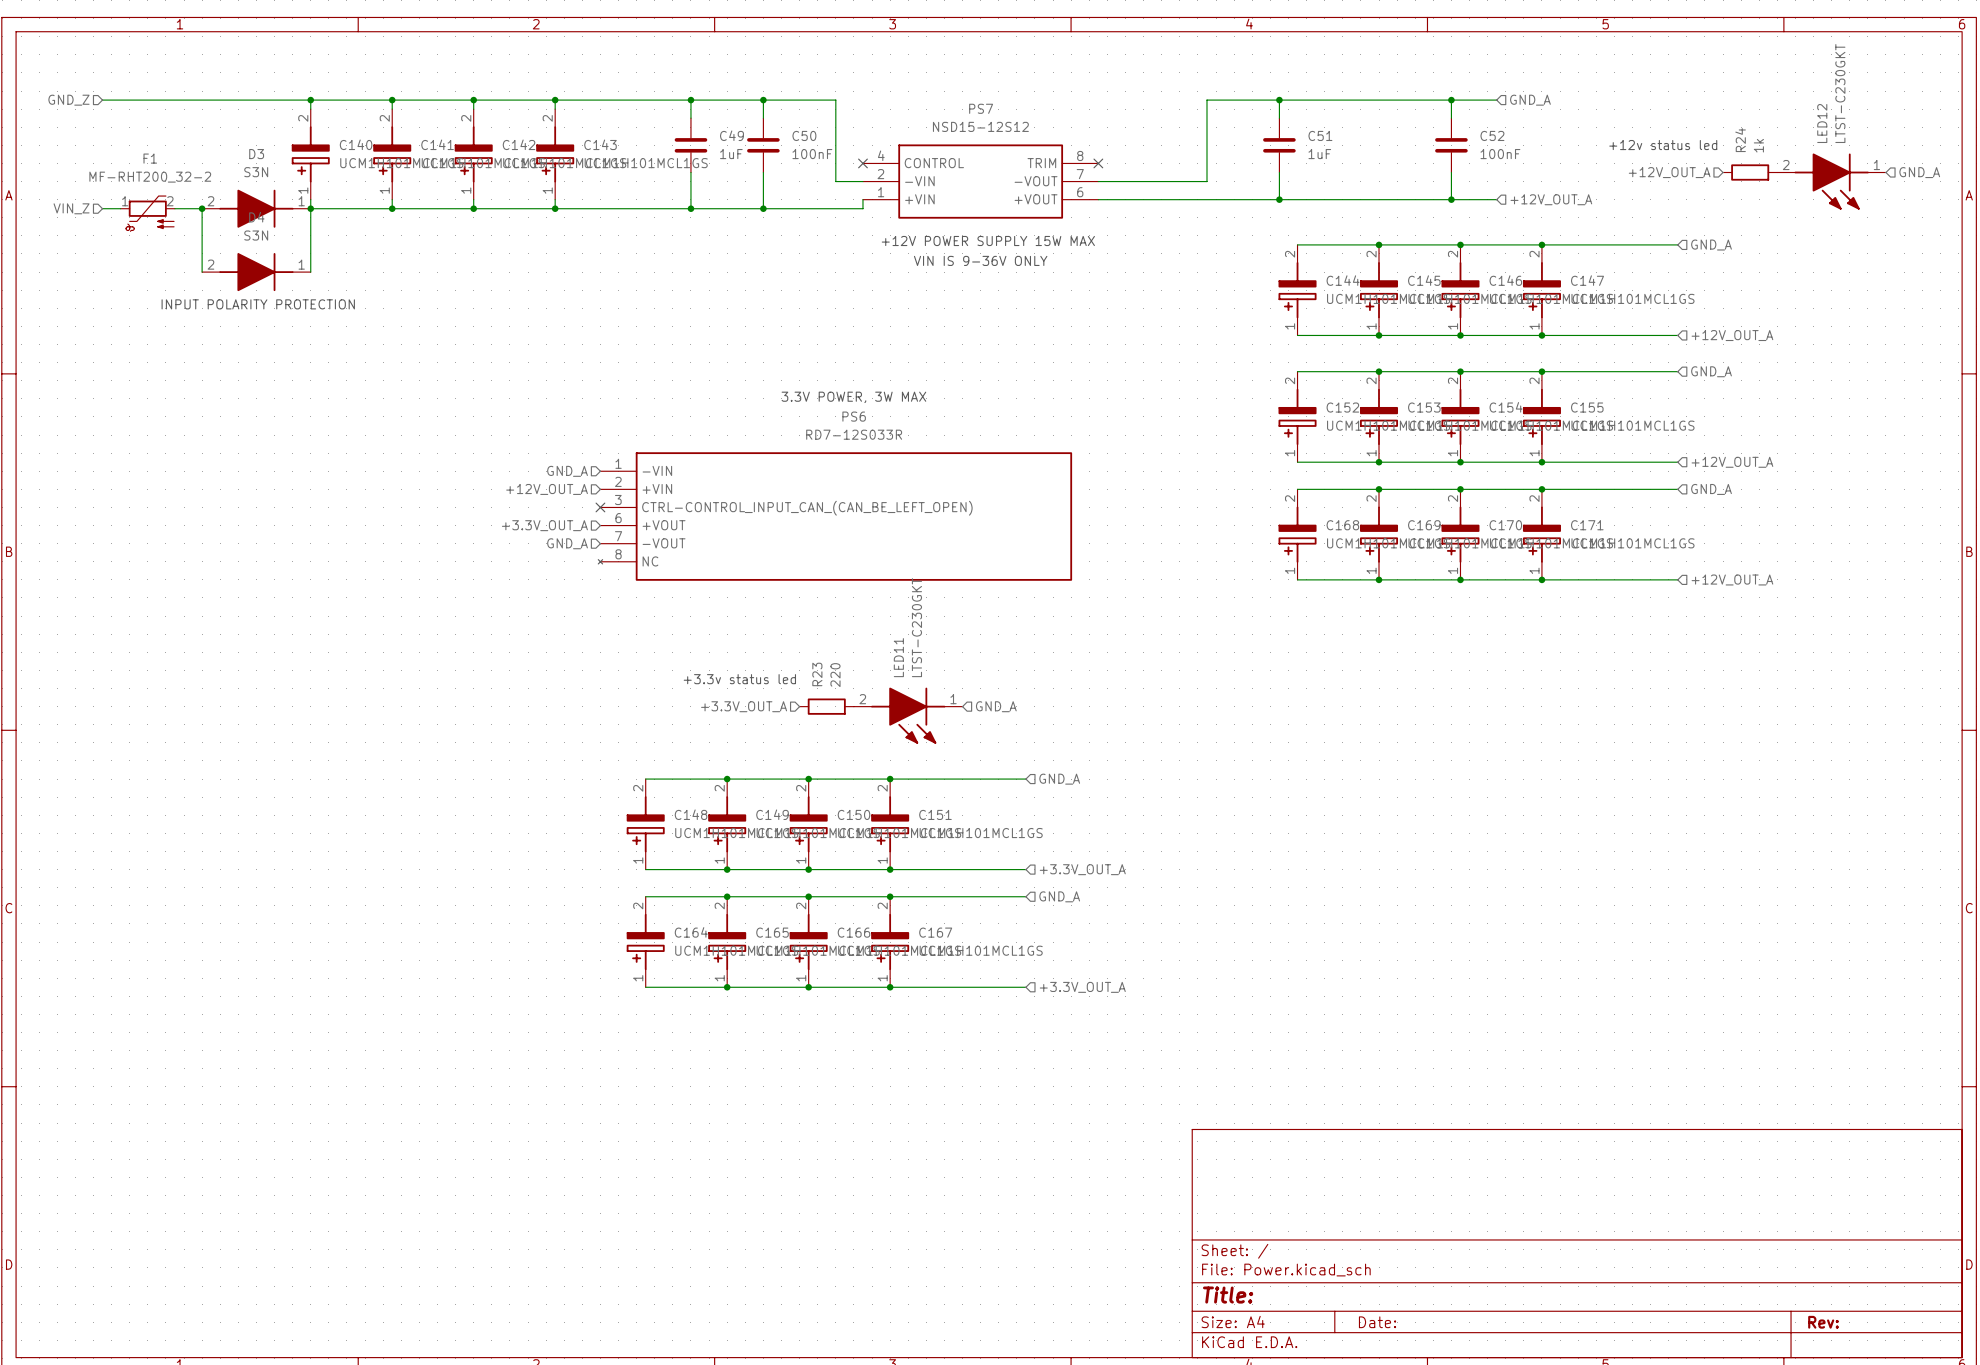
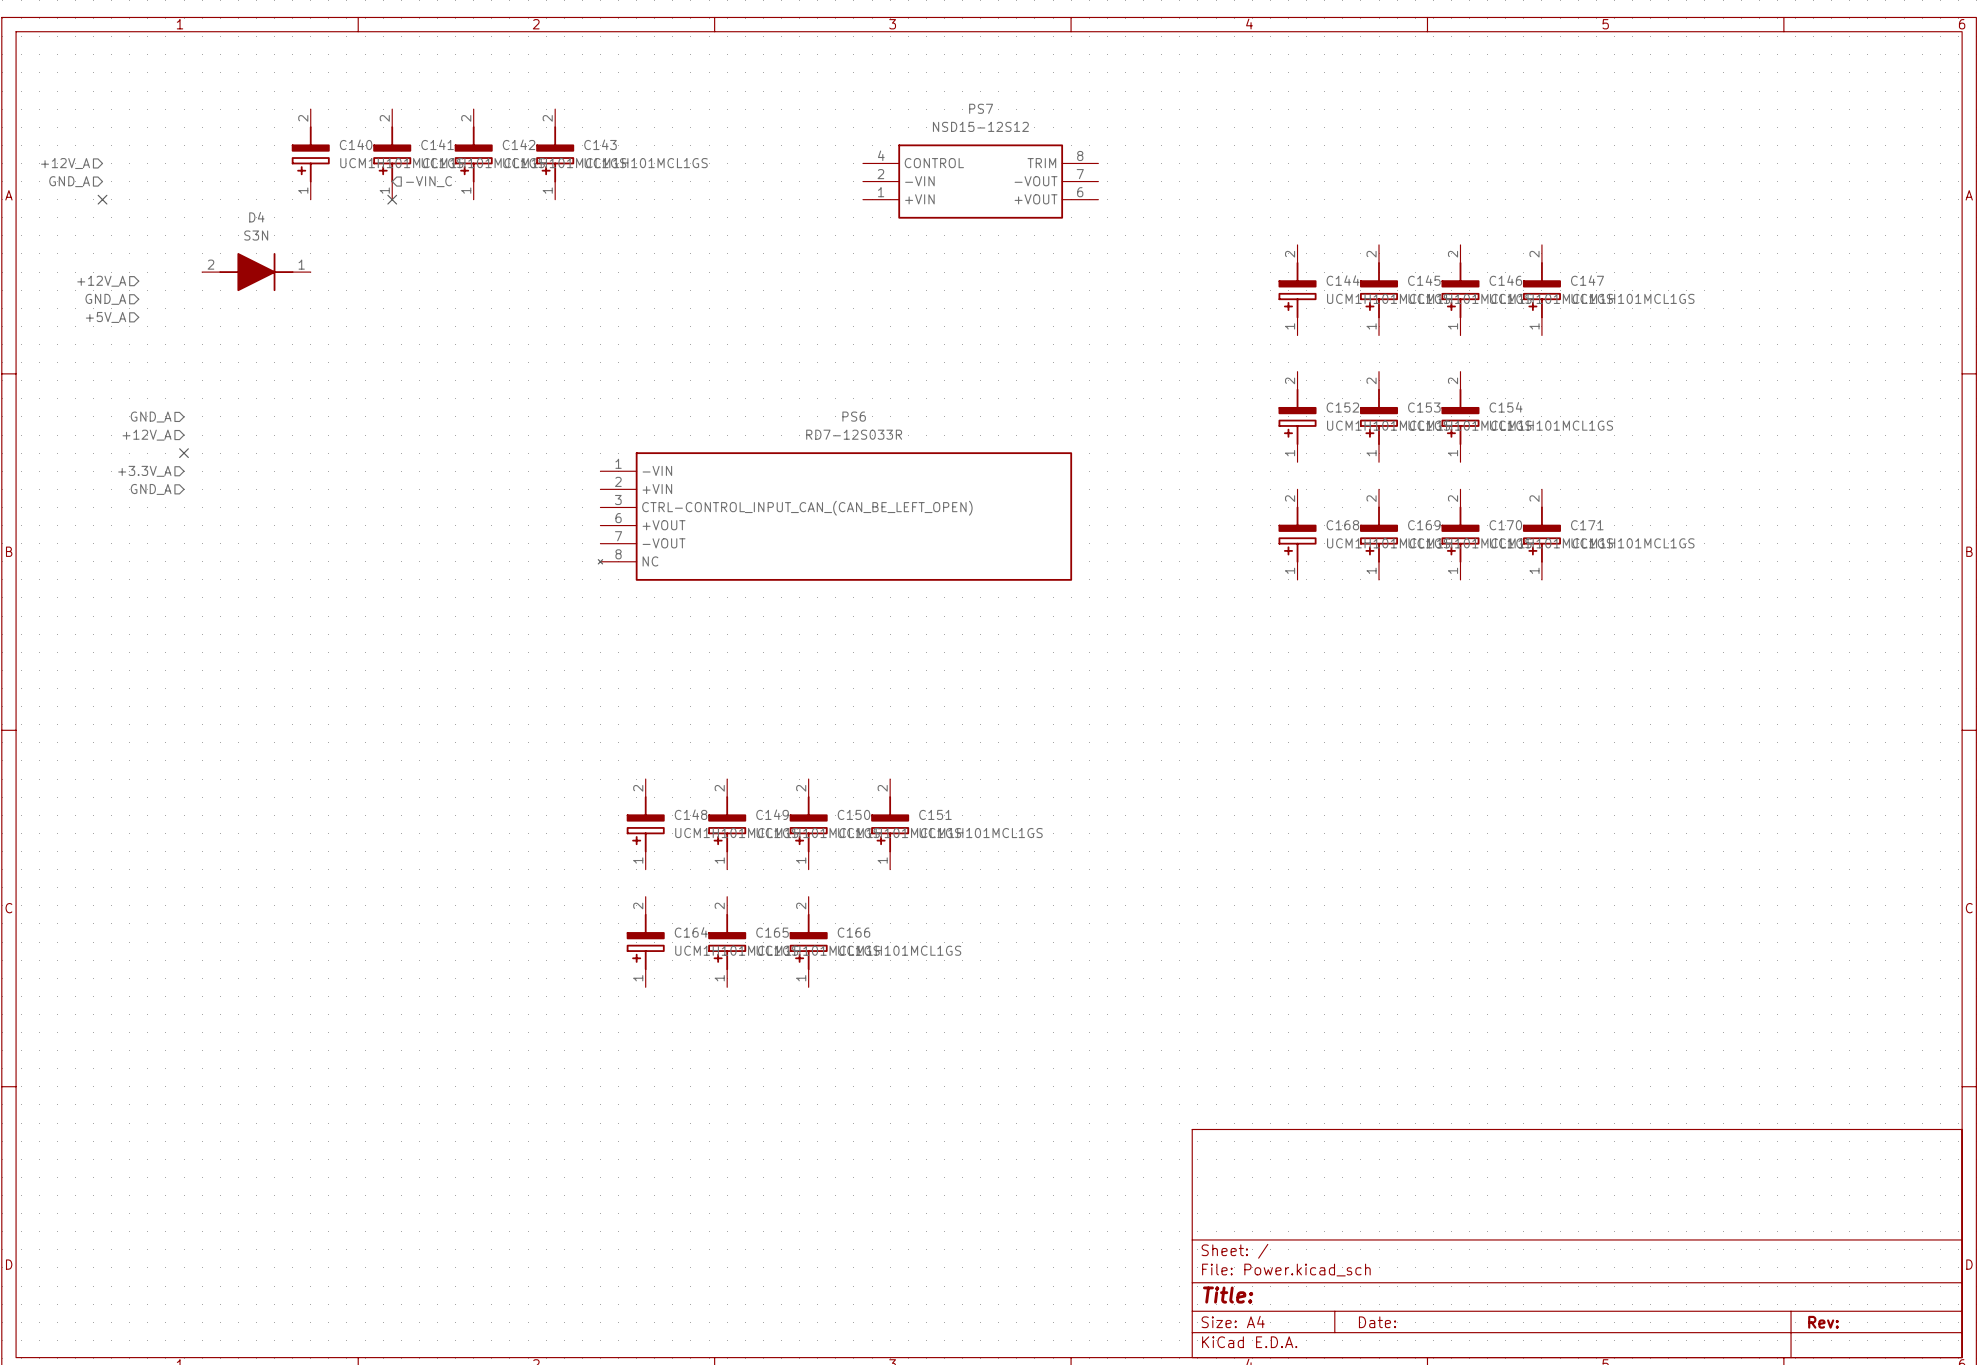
hierarchical label: GND_Z (68, 100) -> none
wire: (102, 100) (835, 100) (835, 181) (862, 181) -> none
wire: (310, 100) (310, 109) -> none
junction: (310, 100) -> none
wire: (392, 100) (392, 109) -> none
junction: (392, 100) -> none
wire: (473, 100) (473, 109) -> none
junction: (473, 100) -> none
wire: (555, 100) (555, 109) -> none
junction: (555, 100) -> none
wire: (690, 100) (690, 118) -> none
junction: (690, 100) -> none
wire: (763, 100) (763, 118) -> none
junction: (763, 100) -> none
wire: (1279, 100) (1279, 118) -> none
junction: (1279, 100) -> none
wire: (1451, 100) (1451, 118) -> none
junction: (1451, 100) -> none
wire: (1496, 100) (1206, 100) (1206, 181) (1098, 181) -> none
hierarchical label: GND_A (1530, 100) -> none
C49: 1uF (690, 145) -> none
C50: 100nF (763, 145) -> none
C51: 1uF (1279, 145) -> none
C52: 100nF (1451, 145) -> none
text: +12v status led (1663, 145) -> none
hierarchical label: none -> +12V_A (65, 163)
no-connect mark: (862, 163) -> none
no-connect mark: (1098, 163) -> none
wire: (690, 172) (690, 208) -> none
wire: (763, 172) (763, 208) -> none
wire: (1279, 172) (1279, 199) -> none
wire: (1451, 172) (1451, 199) -> none
hierarchical label: +12V_OUT_A (1669, 172) -> none
R24: 1k (1750, 172) -> none
hierarchical label: GND_A (1919, 172) -> none
hierarchical label: none -> GND_A (69, 181)
hierarchical label: none -> -VIN_C (429, 181)
LED12: LTST-C230GKT (1831, 181) -> none
no-connect mark: none -> (102, 199)
wire: (310, 199) (310, 272) -> none
wire: (392, 199) (392, 208) -> none
no-connect mark: none -> (392, 199)
wire: (473, 199) (473, 208) -> none
wire: (555, 199) (555, 208) -> none
wire: (862, 199) (862, 208) (310, 208) -> none
wire: (1098, 199) (1496, 199) -> none
junction: (1279, 199) -> none
junction: (1451, 199) -> none
hierarchical label: +12V_OUT_A (1551, 199) -> none
hierarchical label: VIN_Z (71, 208) -> none
wire: (102, 208) (120, 208) -> none
wire: (174, 208) (202, 208) (202, 272) -> none
junction: (202, 208) -> none
D3: S3N (256, 208) -> none
junction: (310, 208) -> none
junction: (392, 208) -> none
junction: (473, 208) -> none
junction: (555, 208) -> none
junction: (690, 208) -> none
junction: (763, 208) -> none
F1: MF-RHT200_32-2 (147, 213) -> none
text: +12V POWER SUPPLY 15W MAX (988, 240) -> none
wire: (1297, 244) (1677, 244) -> none
junction: (1379, 244) -> none
junction: (1460, 244) -> none
junction: (1541, 244) -> none
hierarchical label: GND_A (1711, 245) -> none
text: VIN IS 9-36V ONLY (980, 260) -> none
hierarchical label: none -> +12V_A (101, 281)
hierarchical label: none -> GND_A (105, 299)
text: INPUT POLARITY PROTECTION (258, 304) -> none
hierarchical label: none -> +5V_A (106, 317)
wire: (1297, 335) (1677, 335) -> none
junction: (1379, 335) -> none
junction: (1460, 335) -> none
junction: (1541, 335) -> none
hierarchical label: +12V_OUT_A (1732, 335) -> none
wire: (1297, 371) (1677, 371) -> none
junction: (1379, 371) -> none
junction: (1460, 371) -> none
junction: (1541, 371) -> none
hierarchical label: GND_A (1711, 371) -> none
text: 3.3V POWER, 3W MAX (853, 397) -> none
C155: UCM1H101MCL1GS (1541, 416) -> none
hierarchical label: none -> GND_A (151, 417)
hierarchical label: none -> +12V_A (147, 435)
no-connect mark: none -> (184, 453)
wire: (1297, 462) (1677, 462) -> none
junction: (1379, 462) -> none
junction: (1460, 462) -> none
junction: (1541, 462) -> none
hierarchical label: +12V_OUT_A (1732, 462) -> none
hierarchical label: none -> +3.3V_A (144, 471)
hierarchical label: GND_A (567, 471) -> none
hierarchical label: none -> GND_A (151, 489)
hierarchical label: +12V_OUT_A (547, 489) -> none
wire: (1297, 489) (1677, 489) -> none
junction: (1379, 489) -> none
junction: (1460, 489) -> none
junction: (1541, 489) -> none
hierarchical label: GND_A (1711, 489) -> none
no-connect mark: (600, 507) -> none
hierarchical label: +3.3V_OUT_A (544, 525) -> none
hierarchical label: GND_A (567, 543) -> none
wire: (1297, 579) (1677, 579) -> none
junction: (1379, 579) -> none
junction: (1460, 579) -> none
junction: (1541, 579) -> none
hierarchical label: +12V_OUT_A (1732, 579) -> none
text: +3.3v status led (739, 679) -> none
hierarchical label: +3.3V_OUT_A (744, 706) -> none
R23: 220 (826, 706) -> none
hierarchical label: GND_A (996, 706) -> none
LED11: LTST-C230GKT (908, 715) -> none
wire: (645, 779) (1025, 779) -> none
junction: (727, 779) -> none
junction: (808, 779) -> none
junction: (890, 779) -> none
hierarchical label: GND_A (1059, 779) -> none
wire: (645, 869) (1025, 869) -> none
junction: (727, 869) -> none
junction: (808, 869) -> none
junction: (890, 869) -> none
hierarchical label: +3.3V_OUT_A (1082, 869) -> none
wire: (645, 896) (1025, 896) -> none
junction: (727, 896) -> none
junction: (808, 896) -> none
junction: (890, 896) -> none
hierarchical label: GND_A (1059, 896) -> none
C167: UCM1H101MCL1GS (890, 942) -> none
wire: (645, 987) (1025, 987) -> none
junction: (727, 987) -> none
junction: (808, 987) -> none
junction: (890, 987) -> none
hierarchical label: +3.3V_OUT_A (1082, 987) -> none

